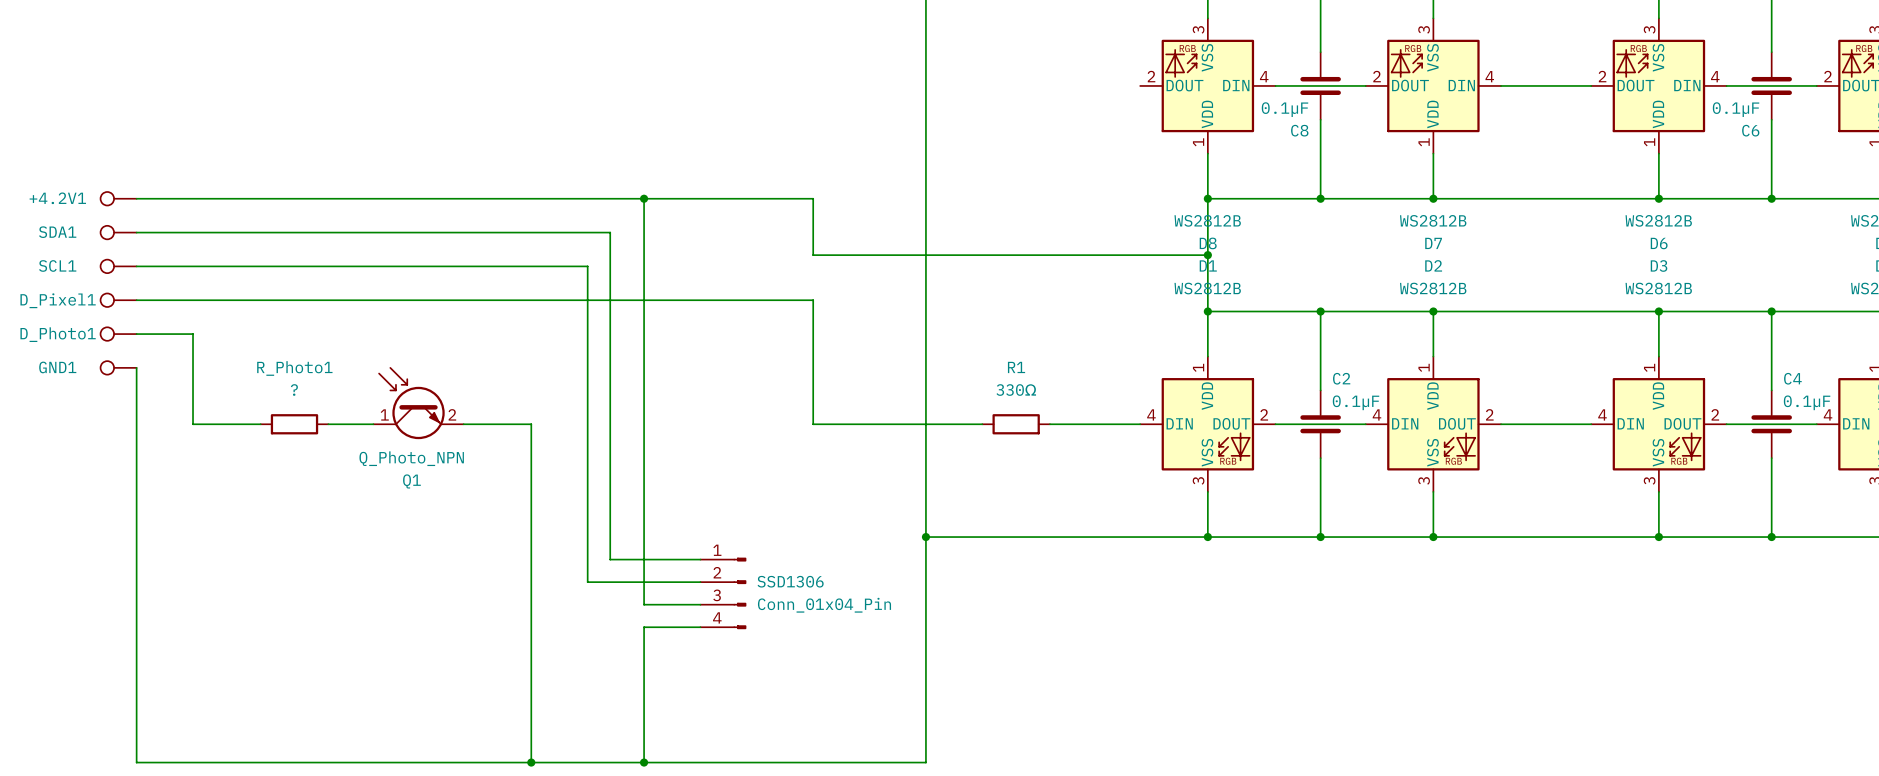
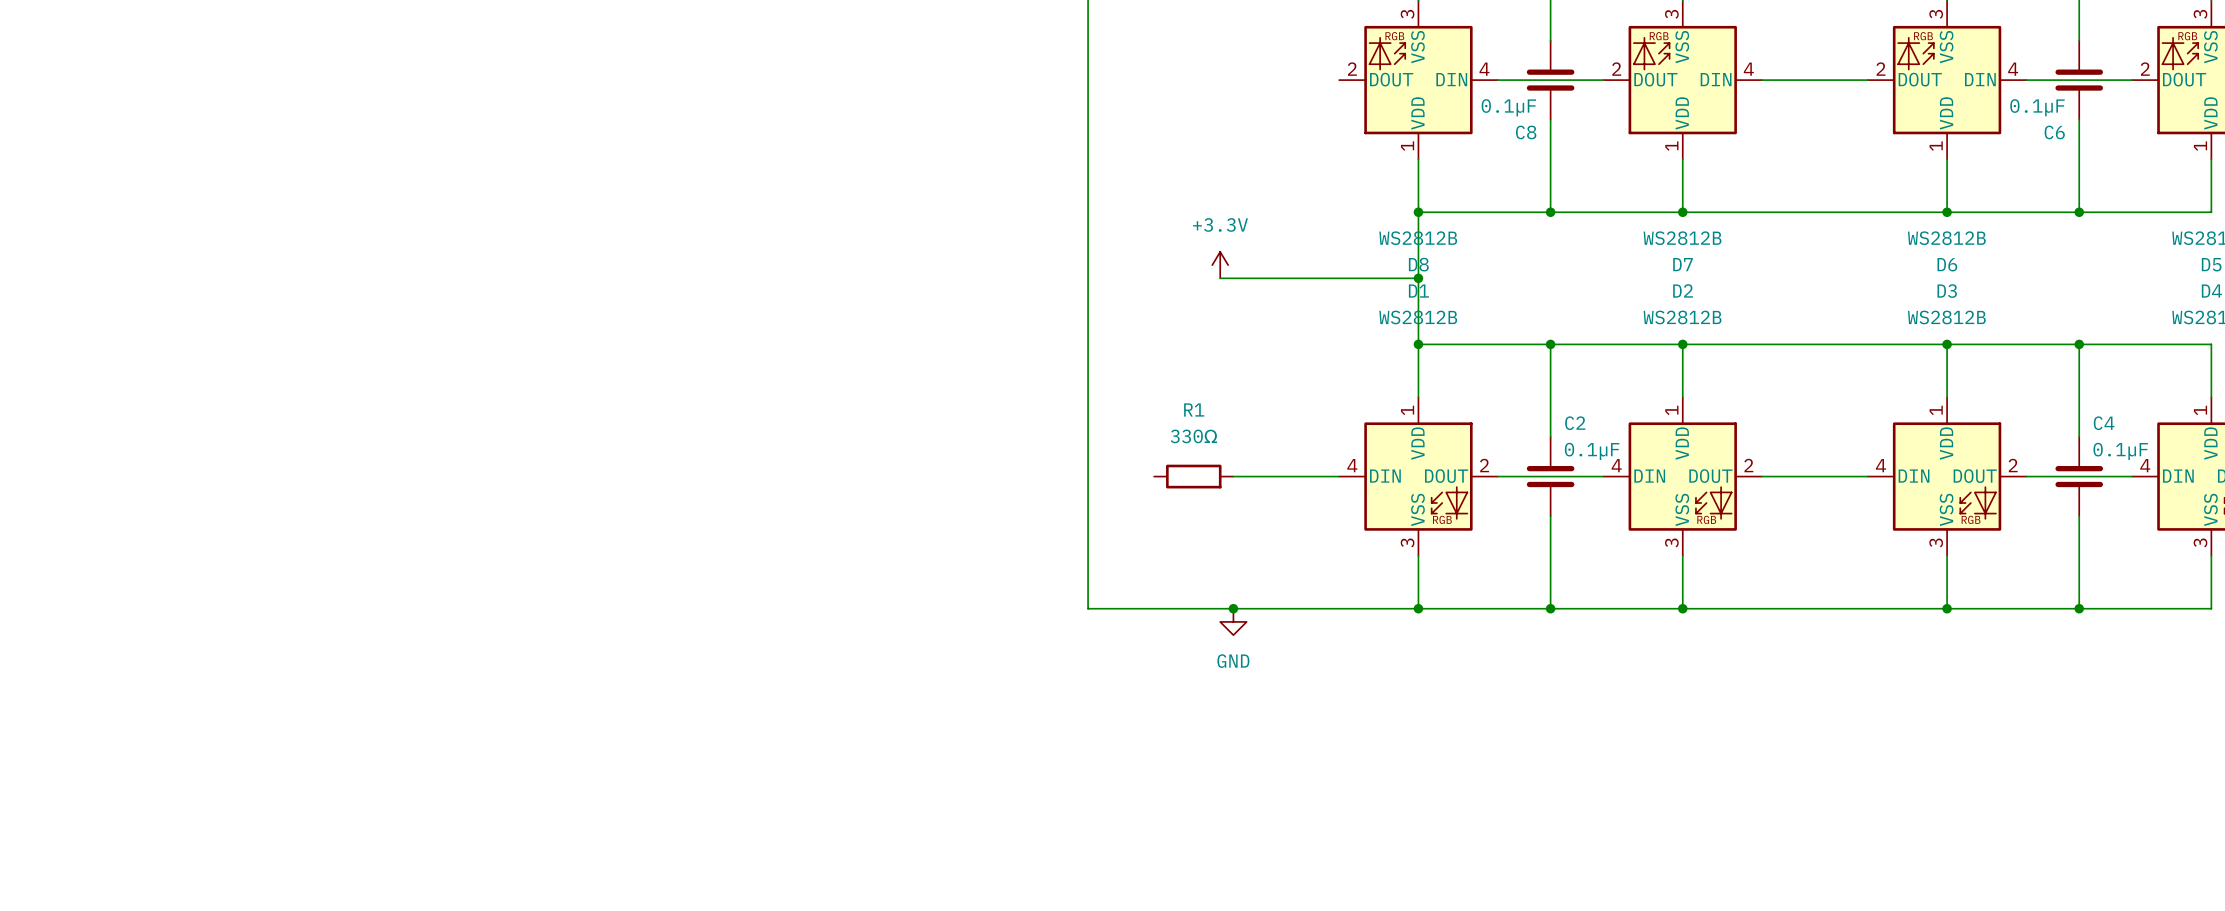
+4.2V1: (118, 198) -> none
wire: (136, 198) (813, 198) (813, 255) (1038, 255) -> none
wire: (644, 198) (644, 604) (700, 604) -> none
junction: (644, 198) -> none
SDA1: (118, 232) -> none
wire: (136, 232) (610, 232) (610, 559) (700, 559) -> none
power symbol: none -> +3.3V (1220, 265)
SCL1: (118, 266) -> none
wire: (136, 266) (587, 266) (587, 582) (700, 582) -> none
D_Pixel1: (118, 300) -> none
wire: (136, 300) (813, 300) (813, 424) (982, 424) -> none
D_Photo1: (118, 334) -> none
wire: (136, 334) (193, 334) (193, 424) (260, 424) -> none
GND1: (118, 367) -> none
wire: (136, 367) (136, 762) (925, 762) (925, 537) -> none
Q1: Q_Photo_NPN (418, 403) -> none
R_Photo1: ? (294, 424) -> none
wire: (328, 424) (373, 424) -> none
wire: (463, 424) (531, 424) (531, 762) -> none
junction: (925, 537) -> none
junction: none -> (1233, 608)
power symbol: none -> GND (1233, 621)
SSD1306: Conn_01x04_Pin (723, 593) -> none
wire: (700, 627) (644, 627) (644, 762) -> none
junction: (531, 762) -> none
junction: (644, 762) -> none

